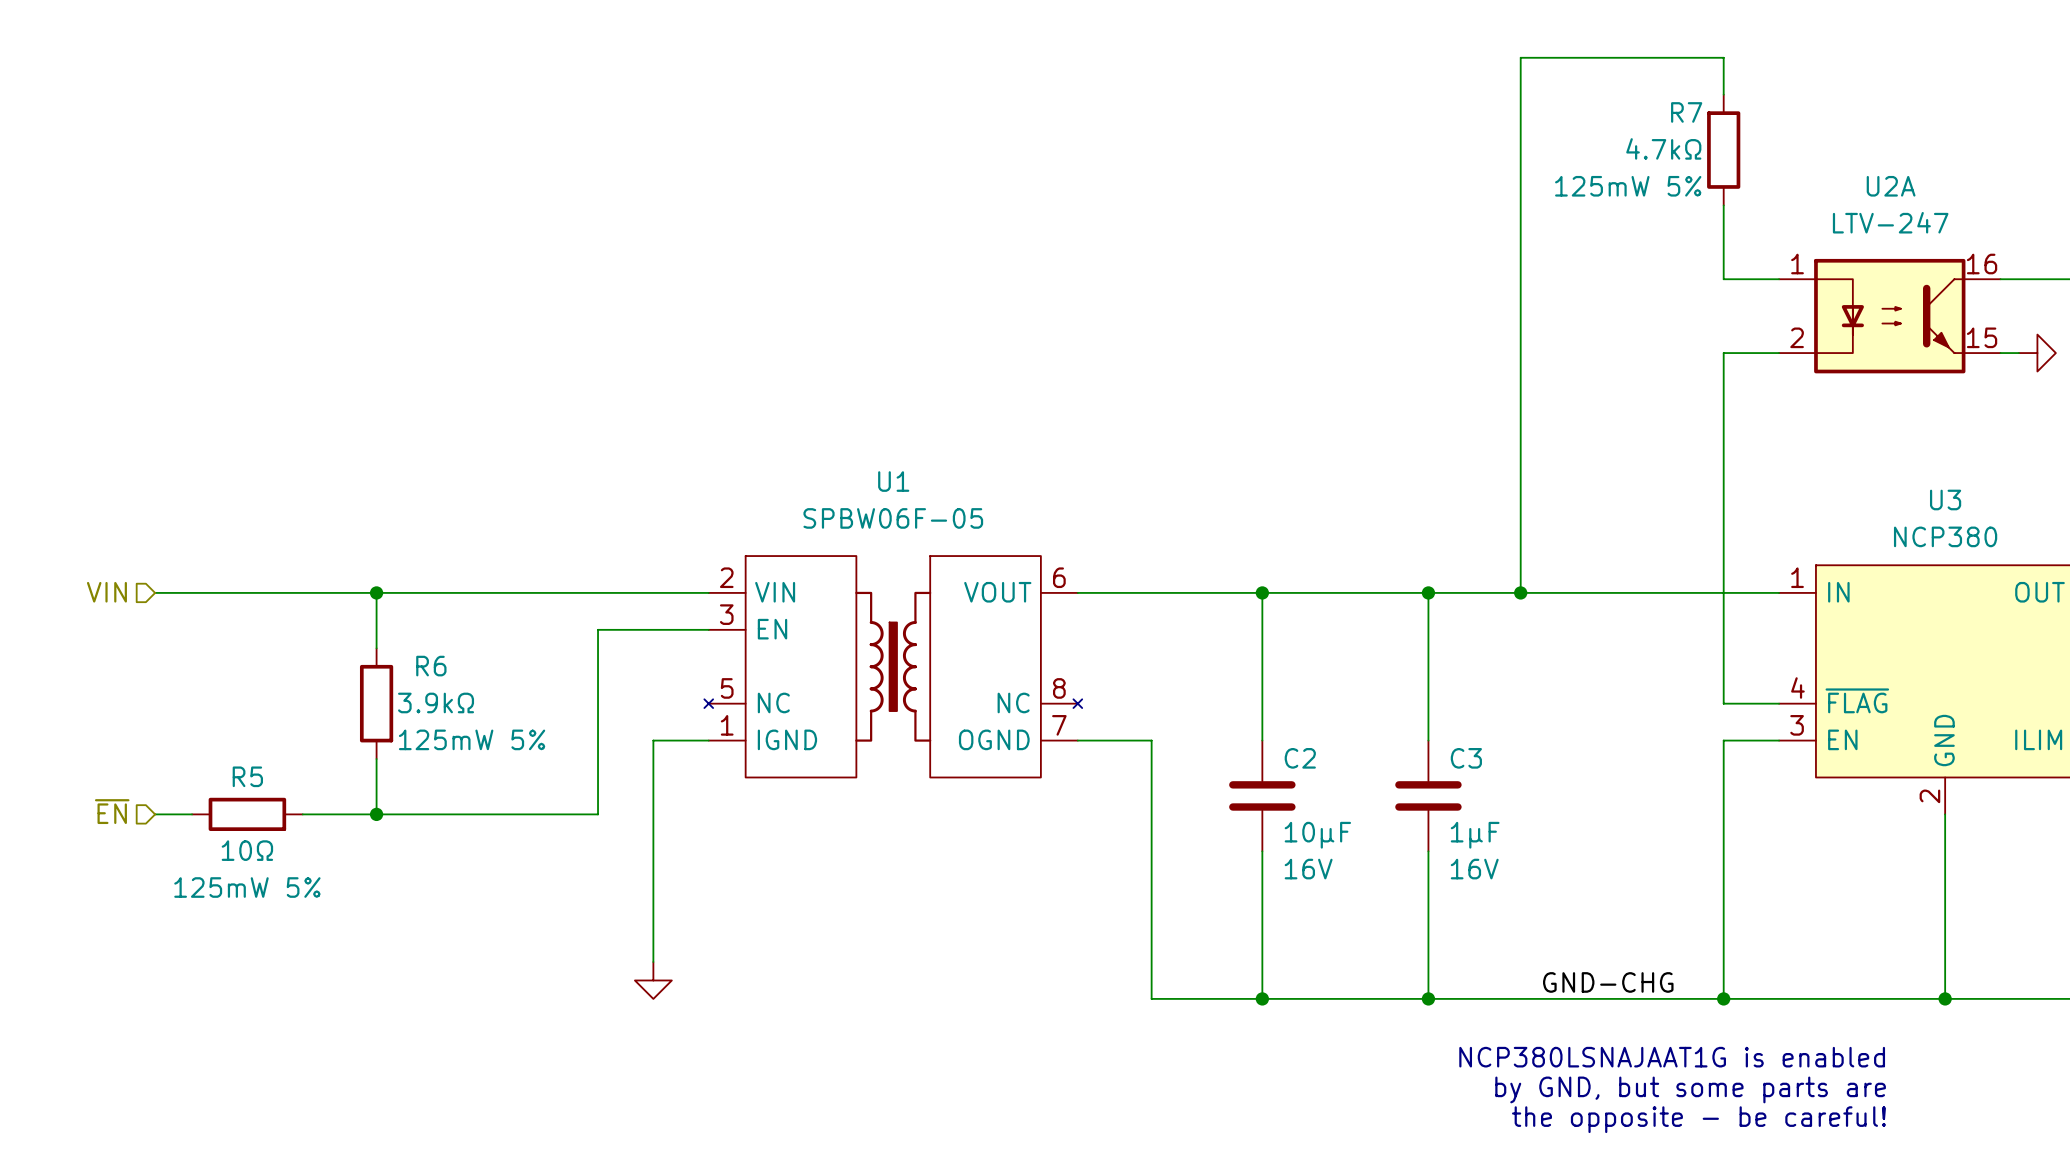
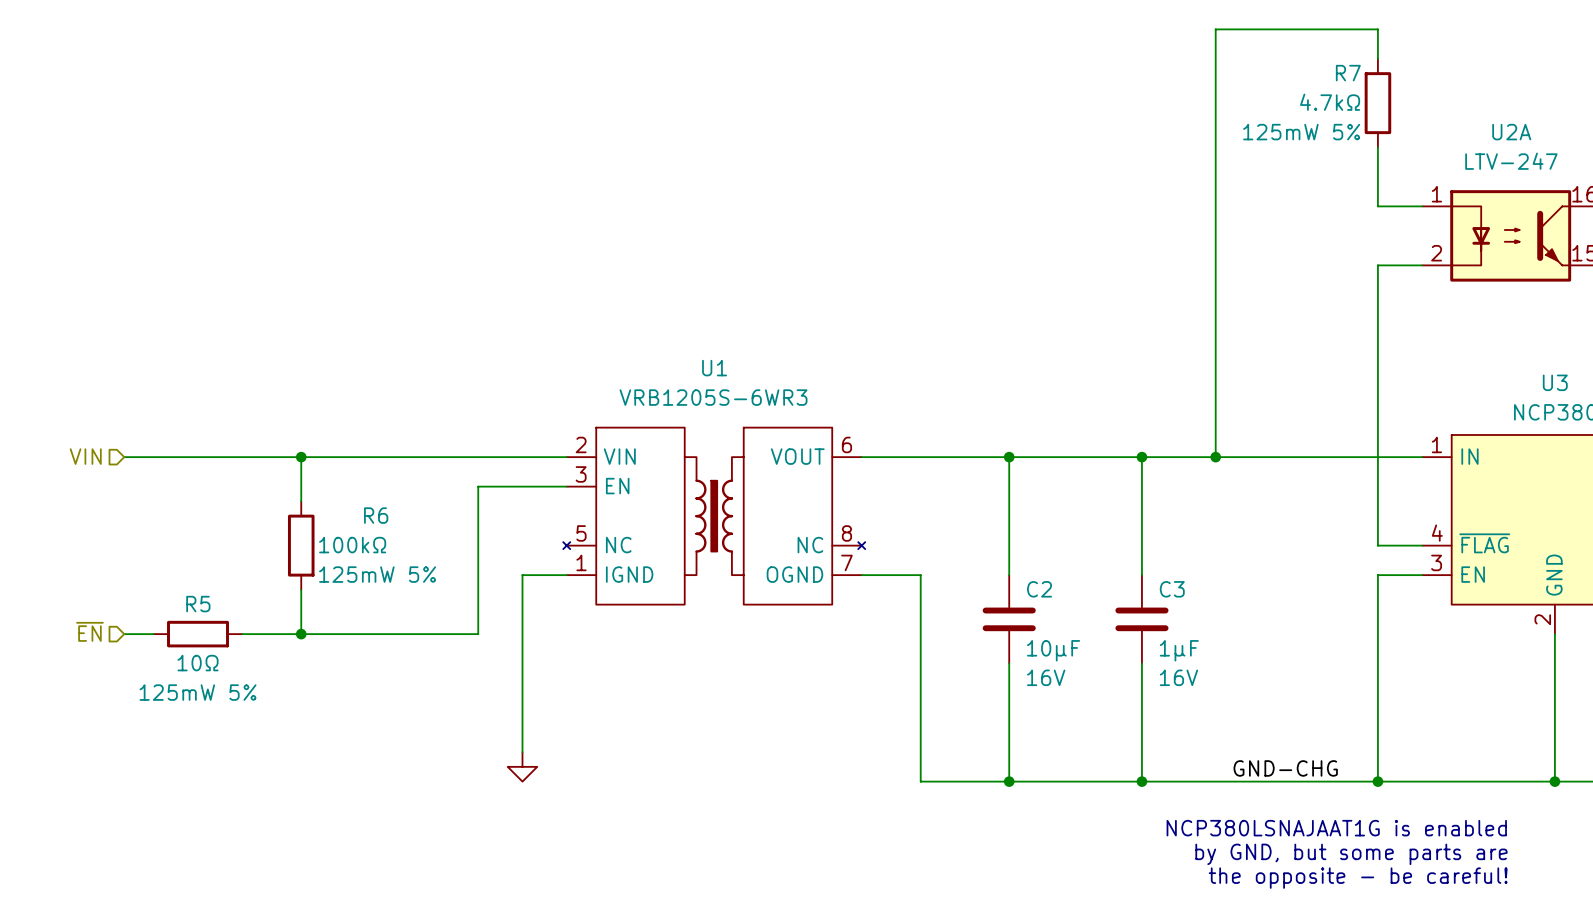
U1 value: SPBW06F-05 (893, 518) -> VRB1205S-6WR3 (713, 397)
R6 name position: R6 (431, 666) -> R6 (376, 515)
R6 value: 3.9kΩ (436, 702) -> 100kΩ (352, 545)

